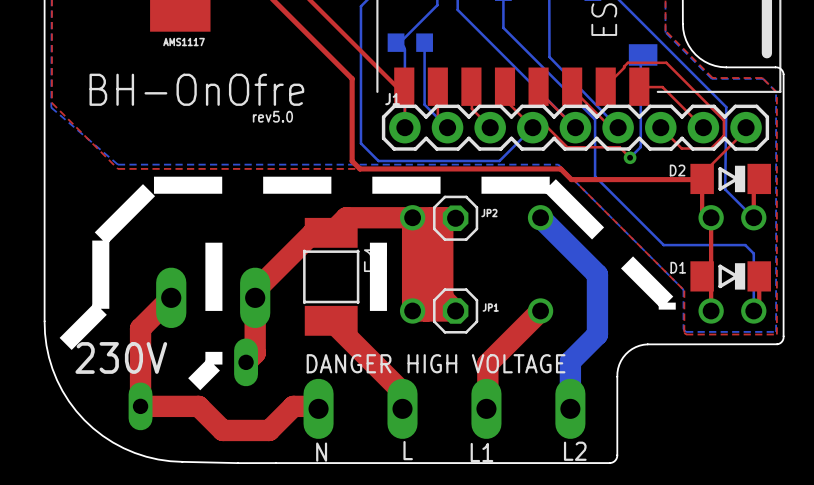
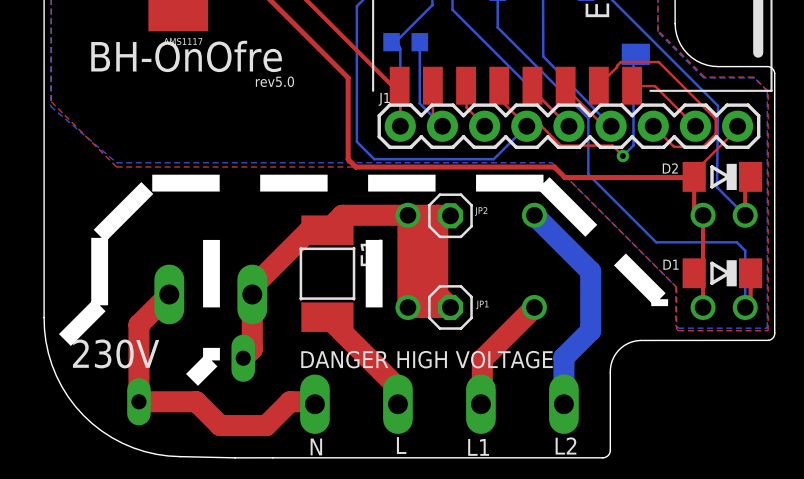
text position: BH-OnOfre (196, 89) -> BH-OnOfre (186, 56)
text position: rev5.0 (272, 116) -> rev5.0 (274, 81)

